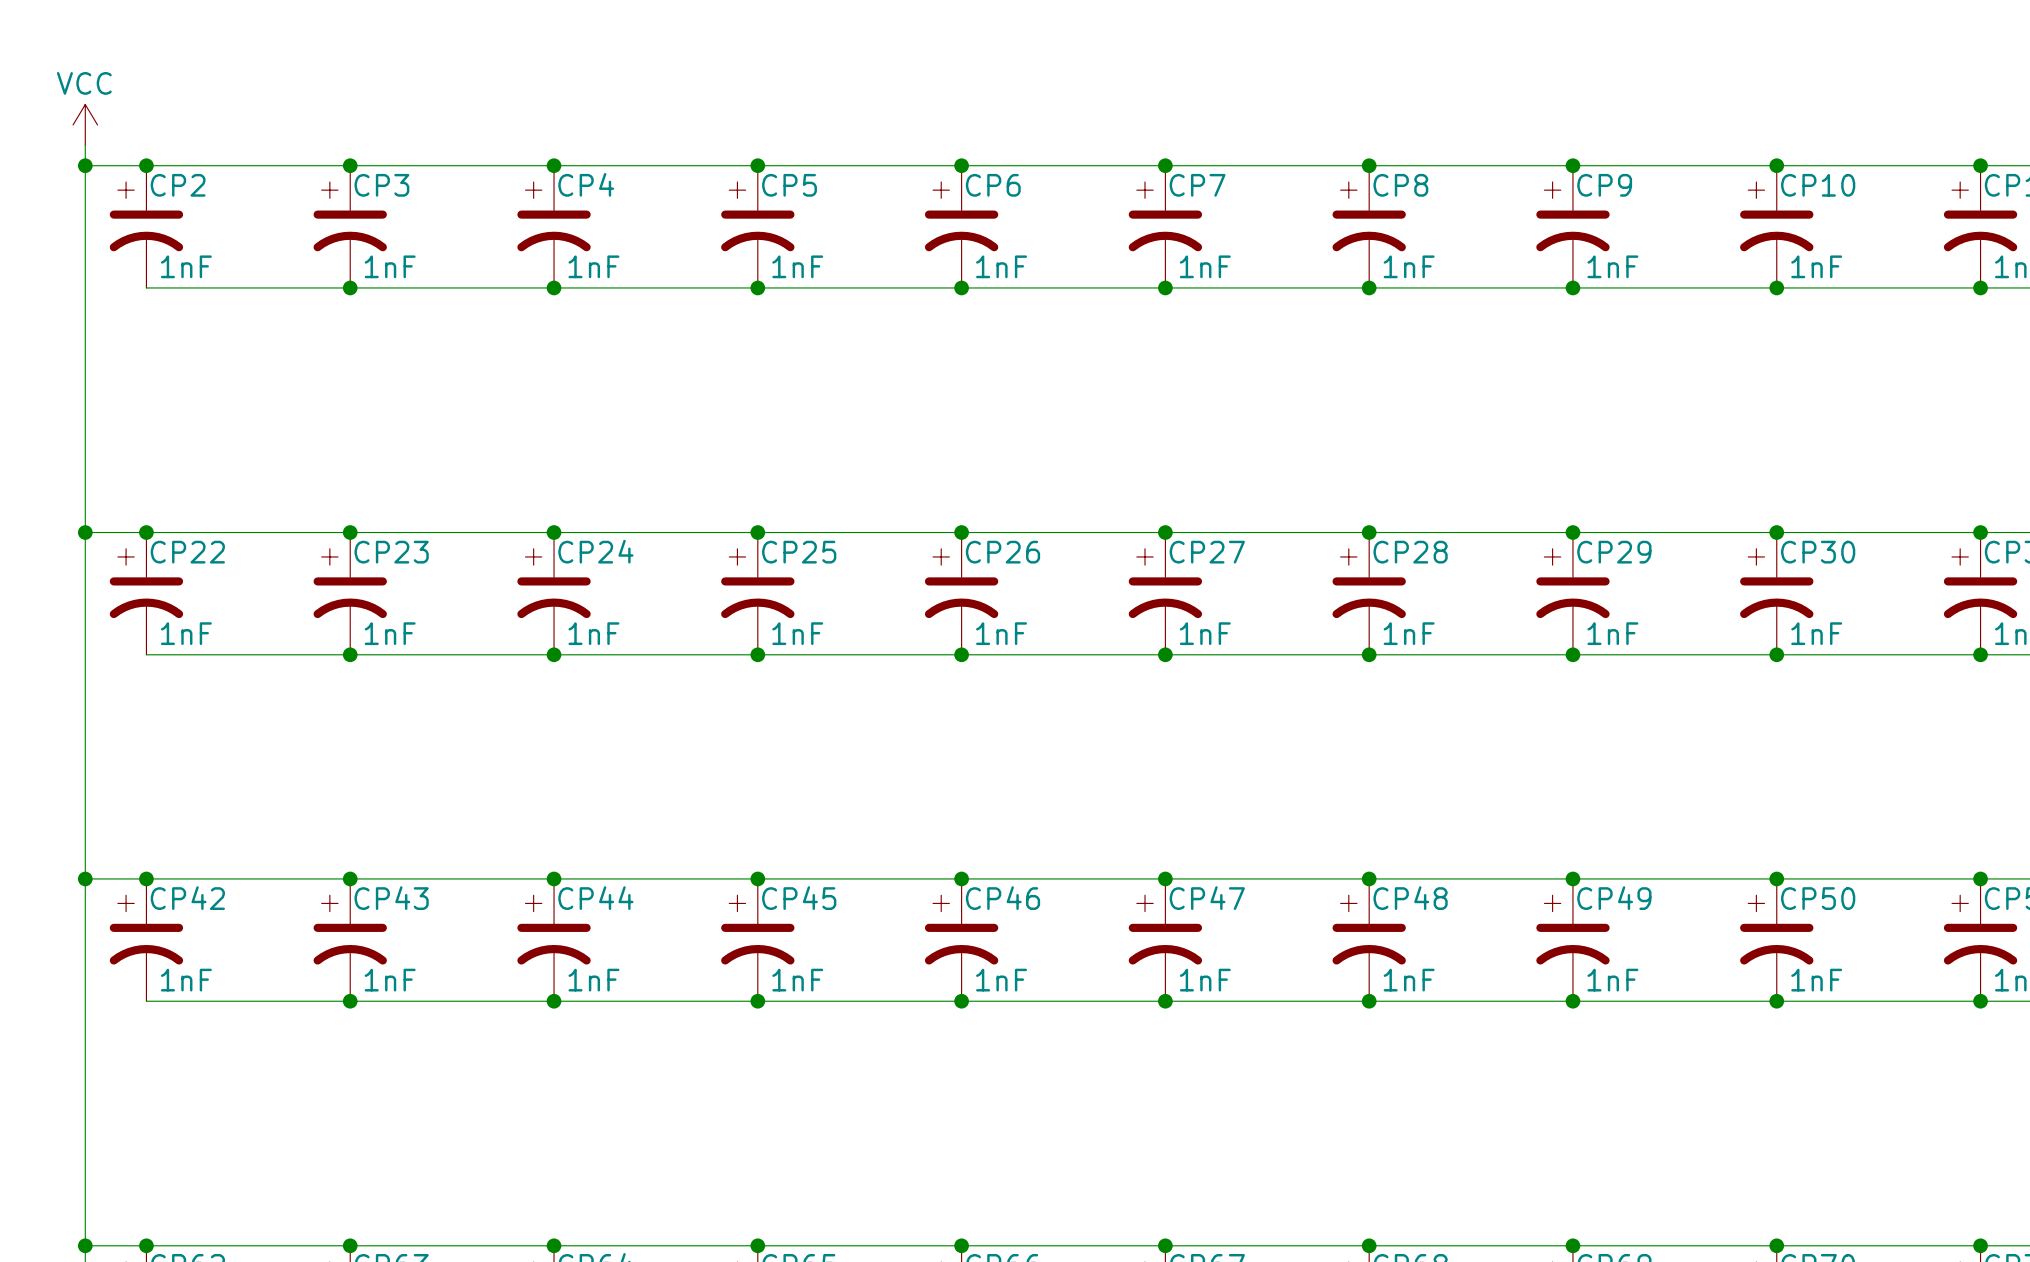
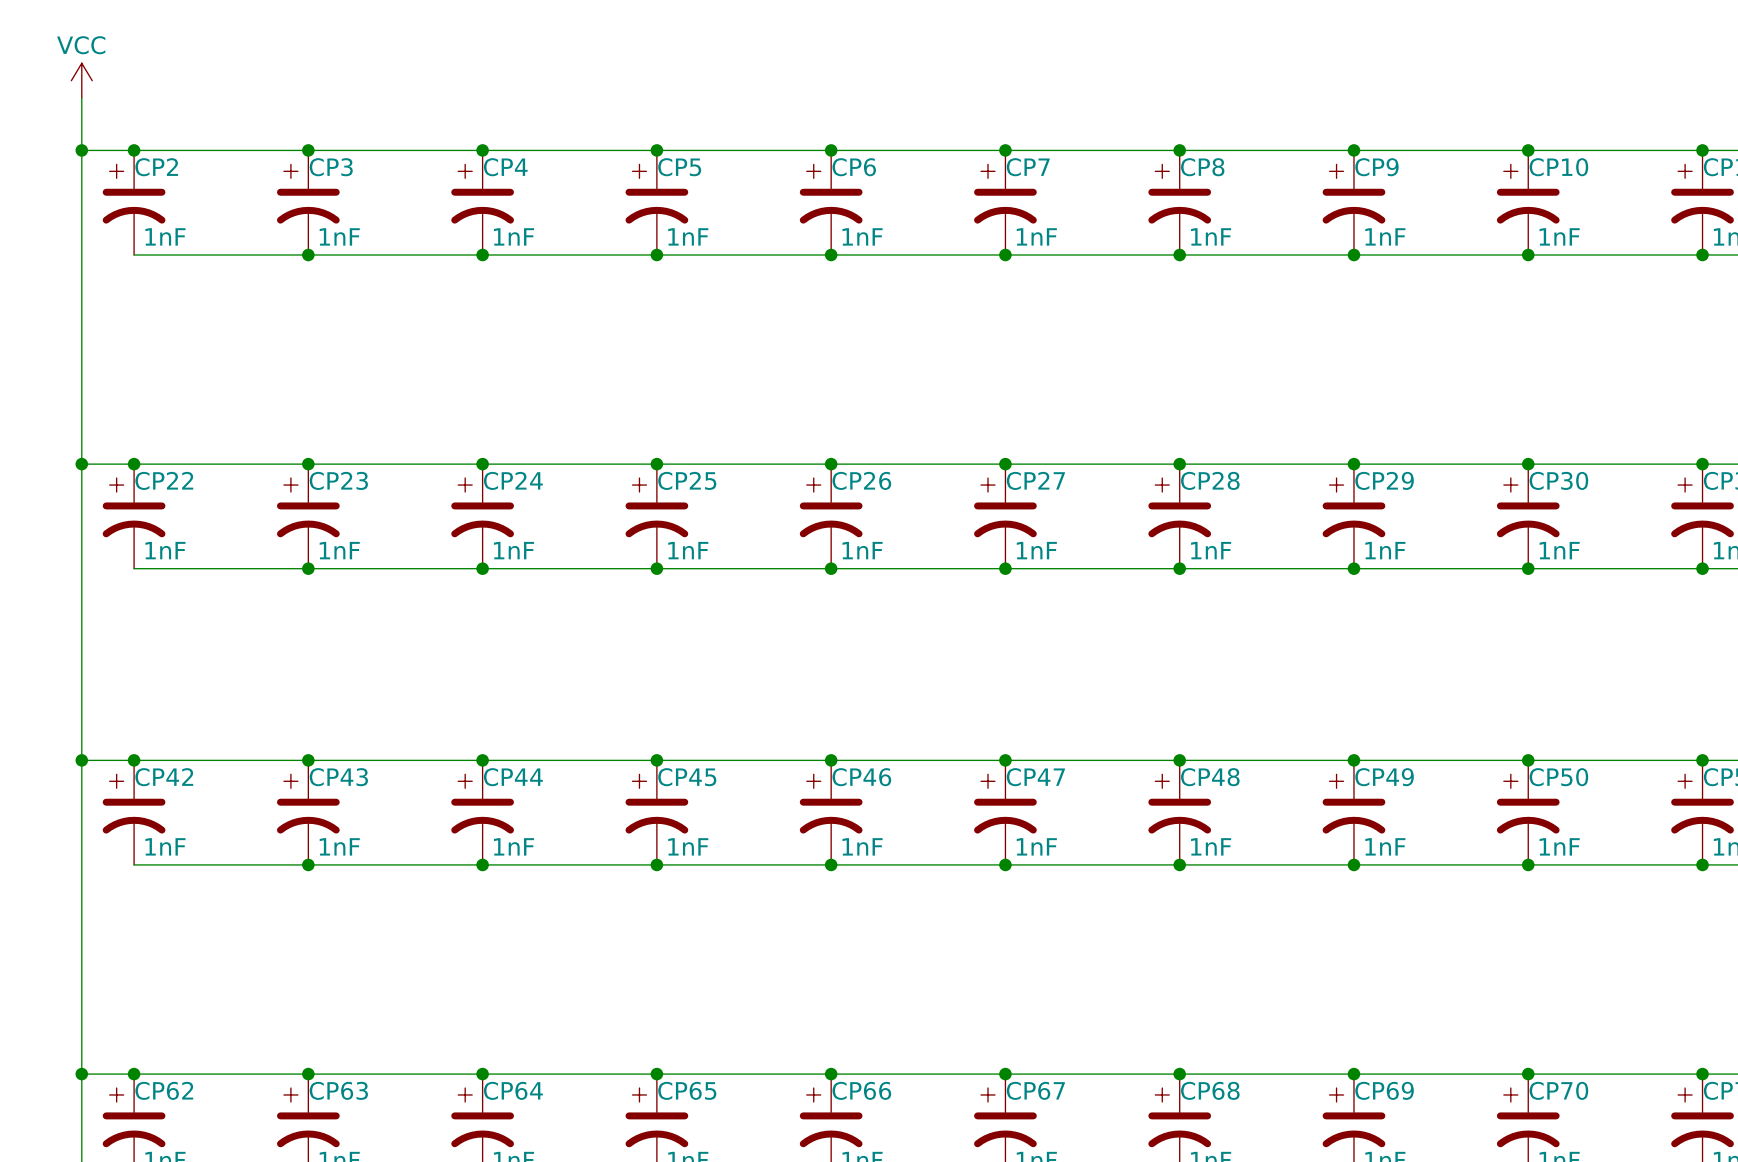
power symbol position: VCC (85, 124) -> VCC (81, 80)

